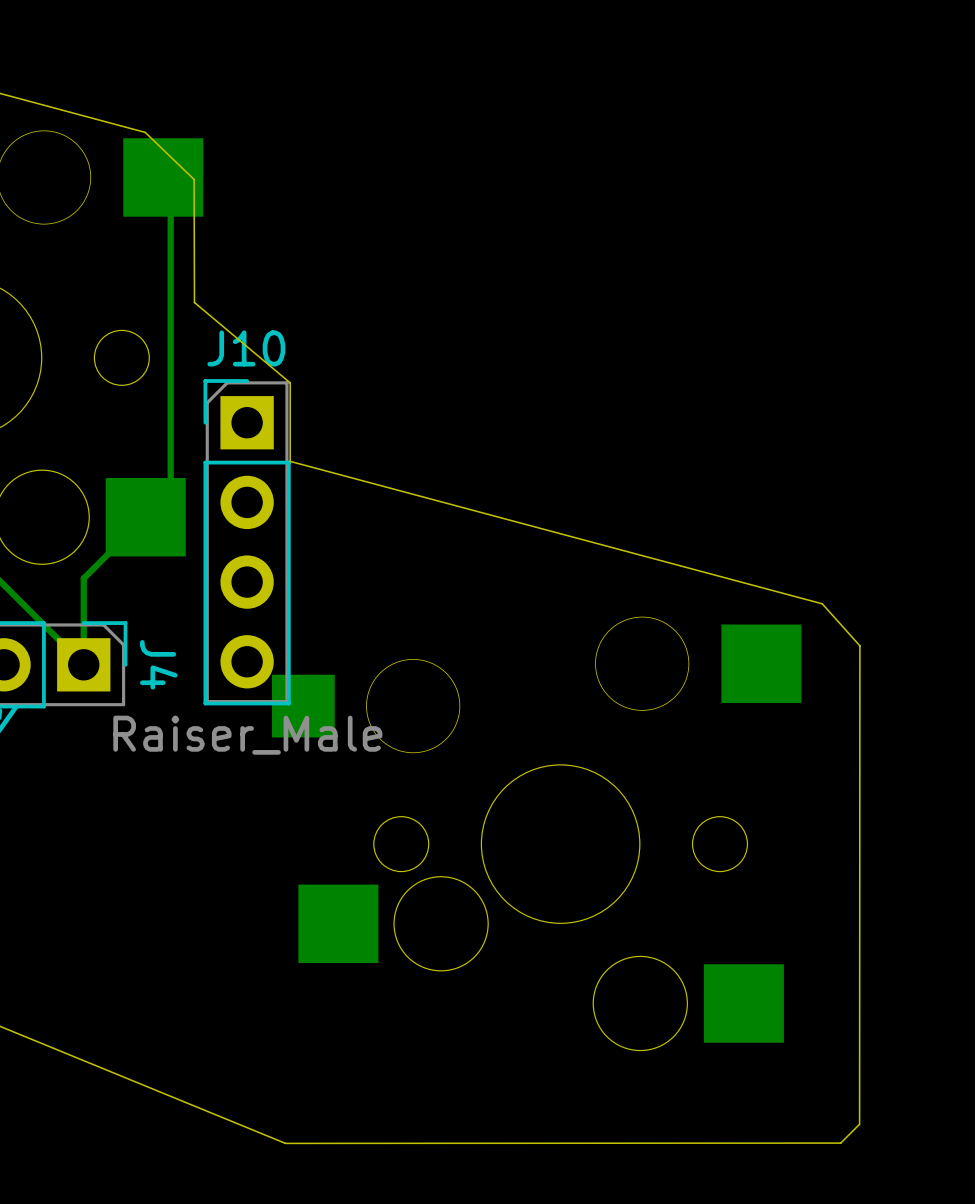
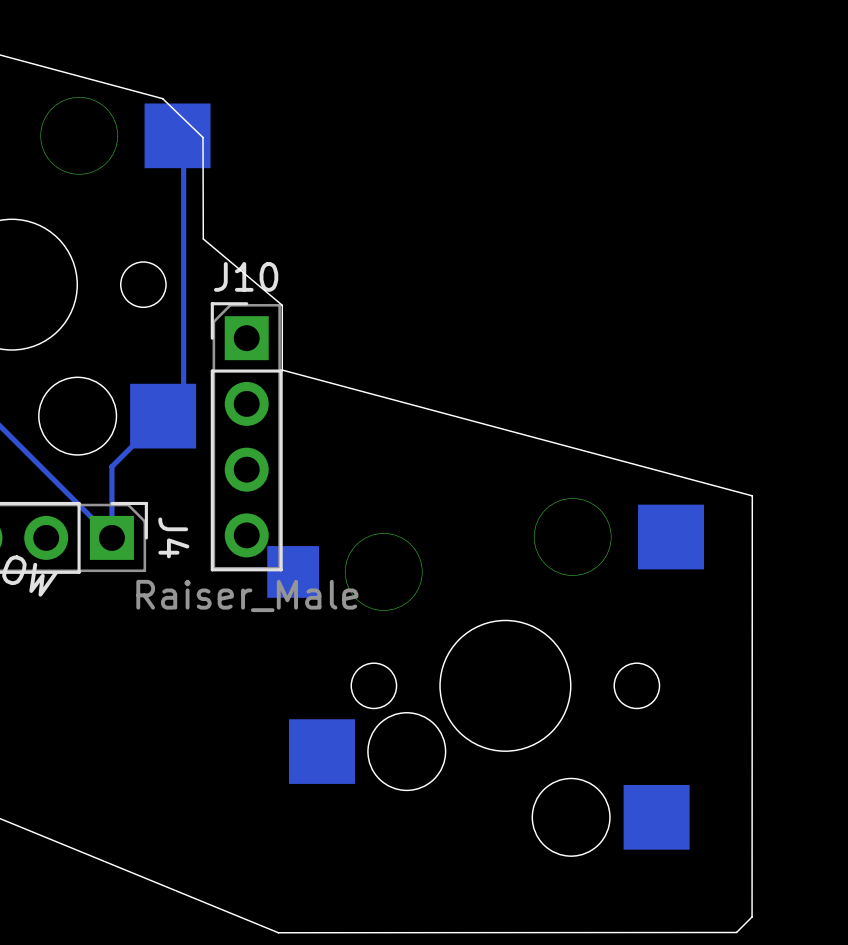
board edge: (290, 461) (822, 603) (859, 645) (859, 1124) -> (282, 370) (752, 495) (752, 916)

